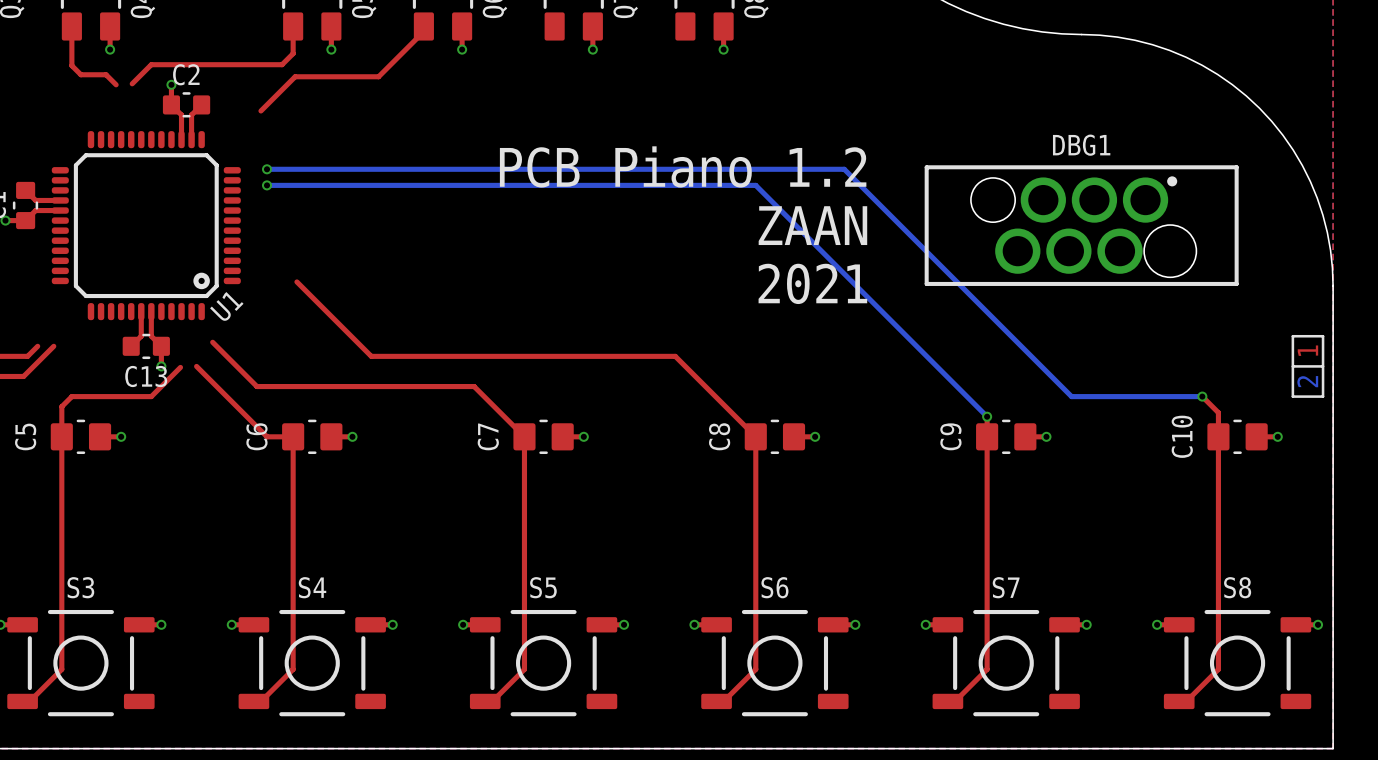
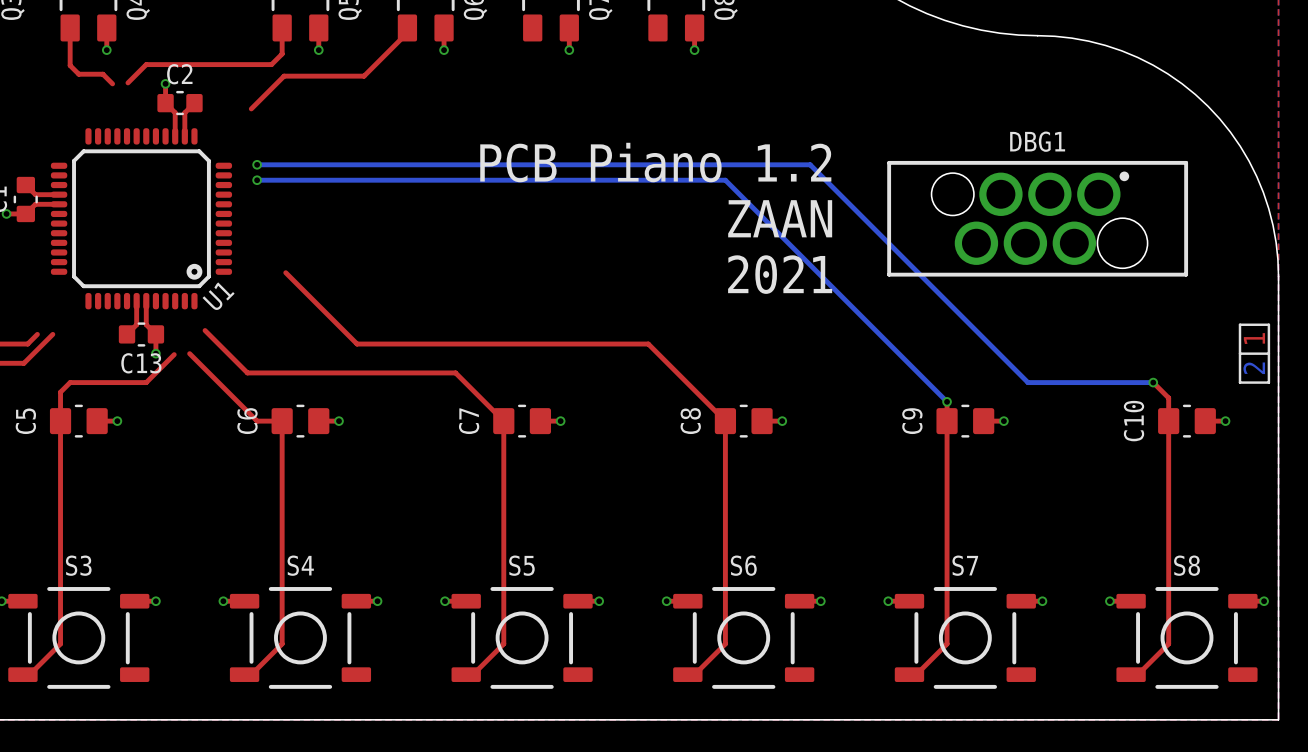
drawing shape: [1291, 334, 1325, 398] -> [1238, 323, 1271, 384]

